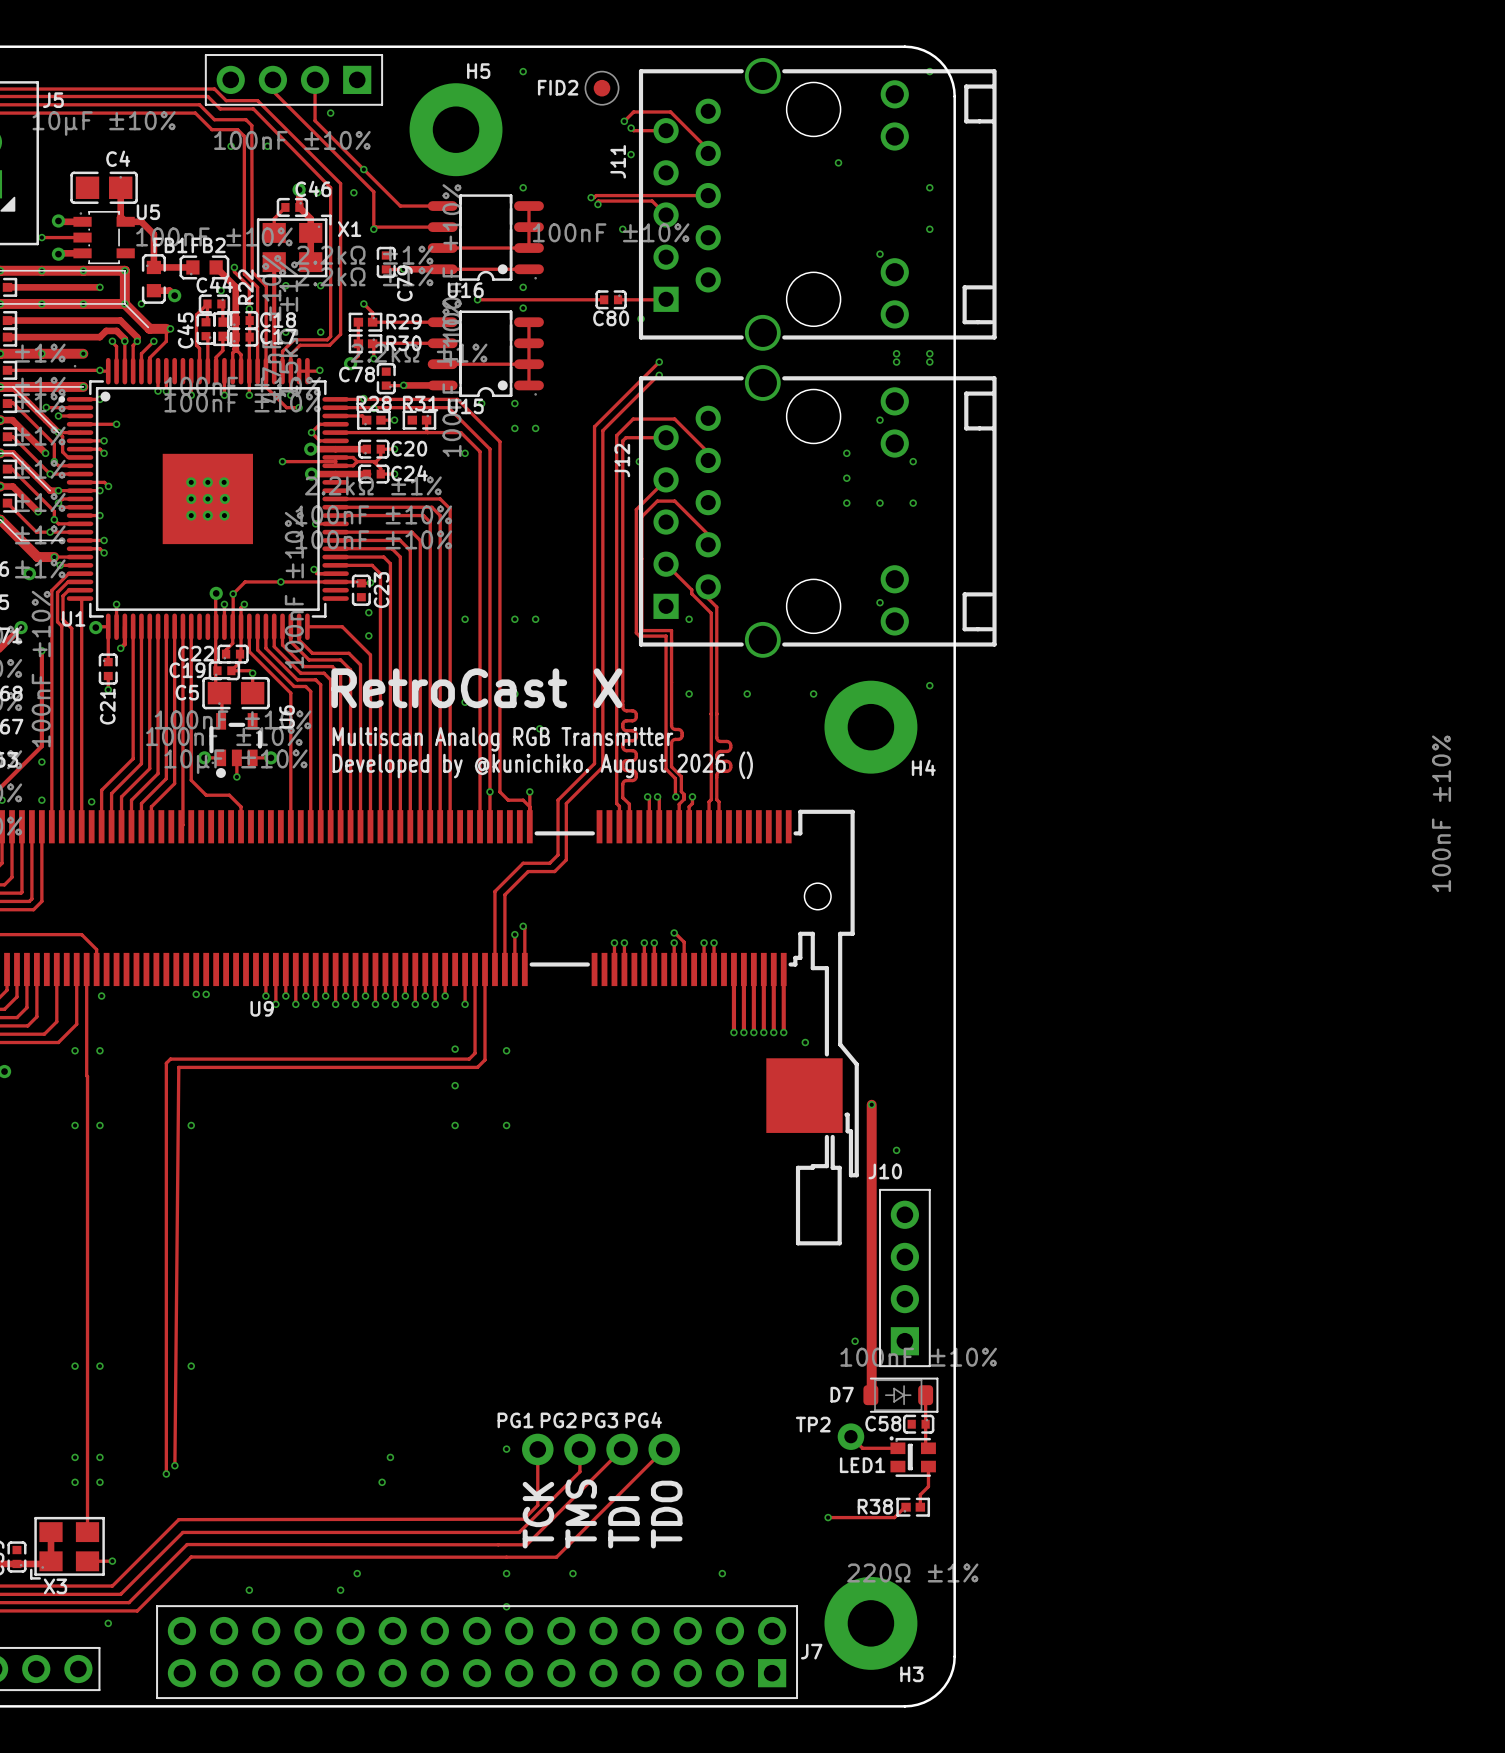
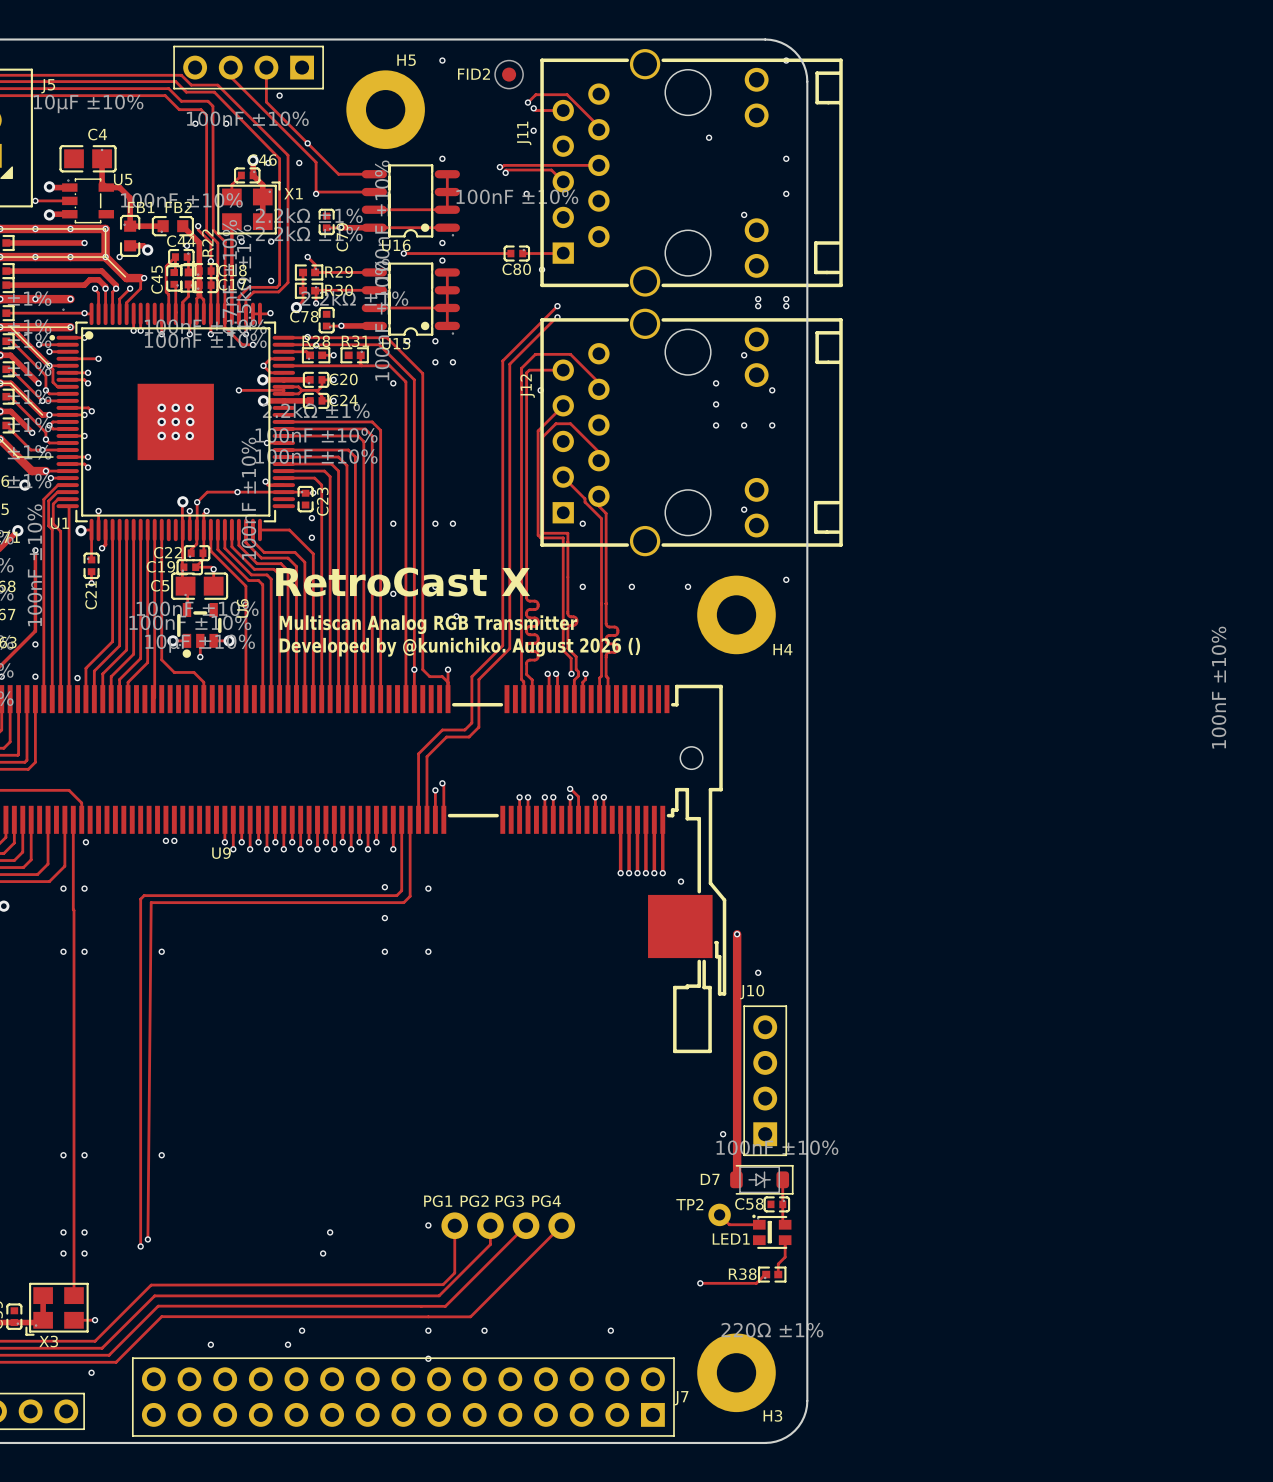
text: TMS (581, 1513) -> none
text: TDO (666, 1514) -> none
text: TCK (538, 1515) -> none
text: TDI (623, 1522) -> none

